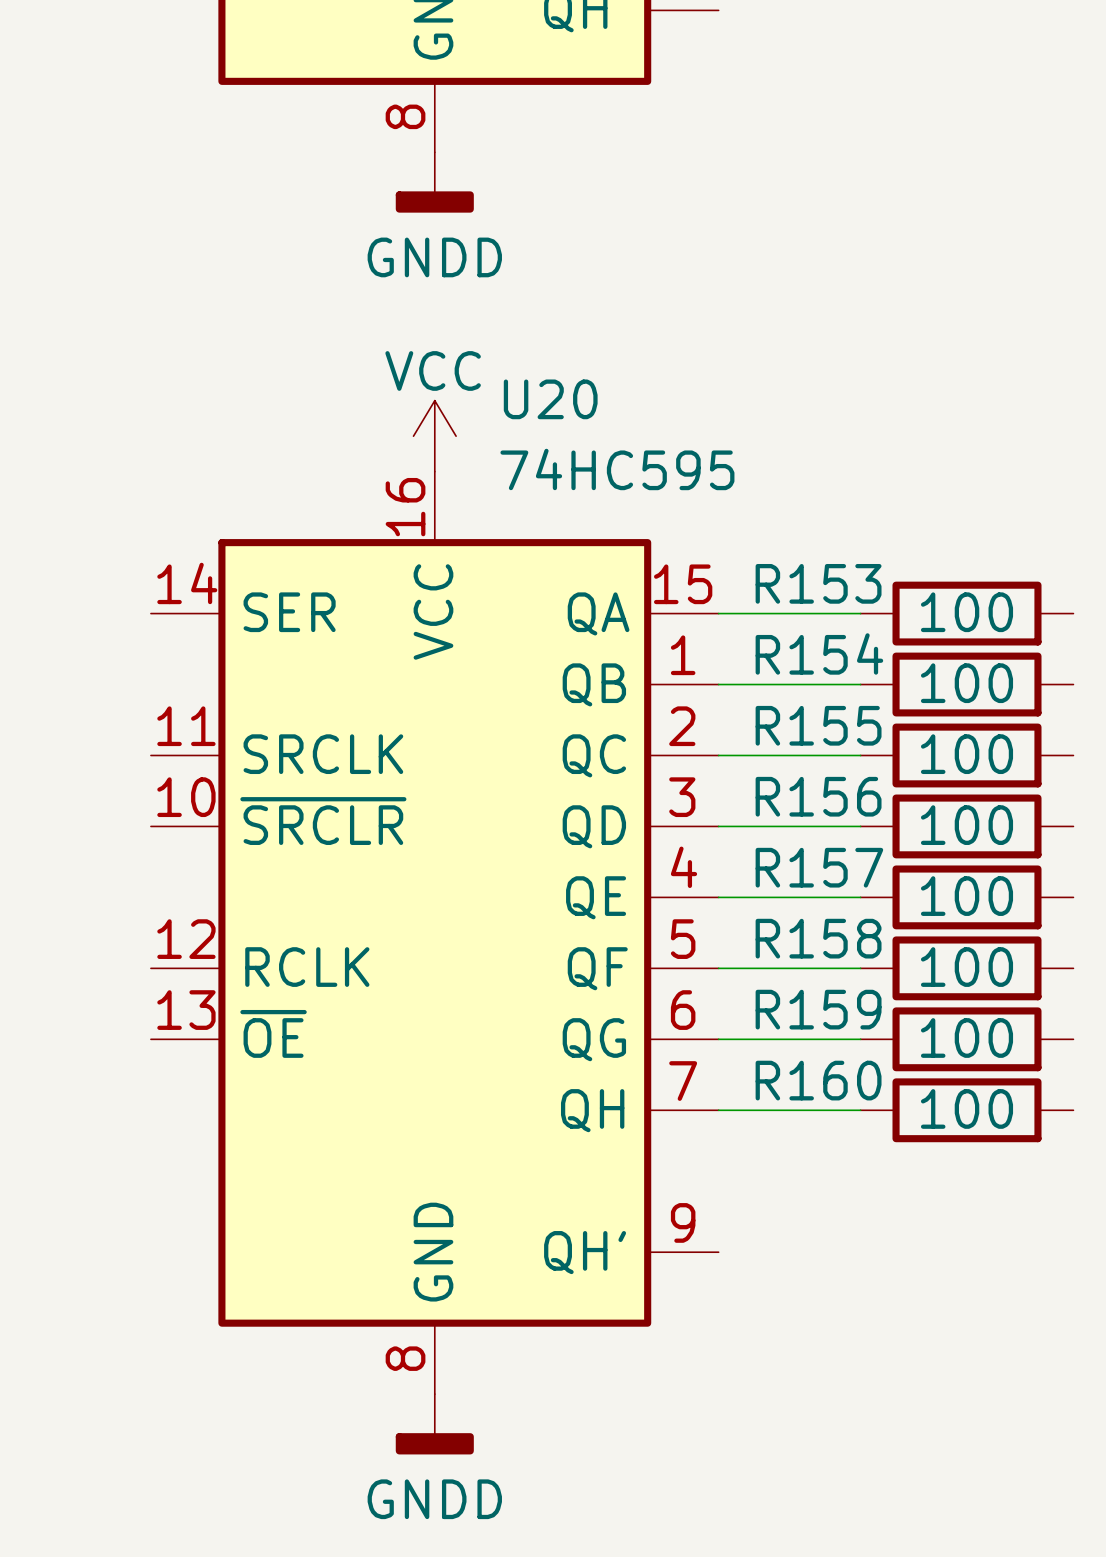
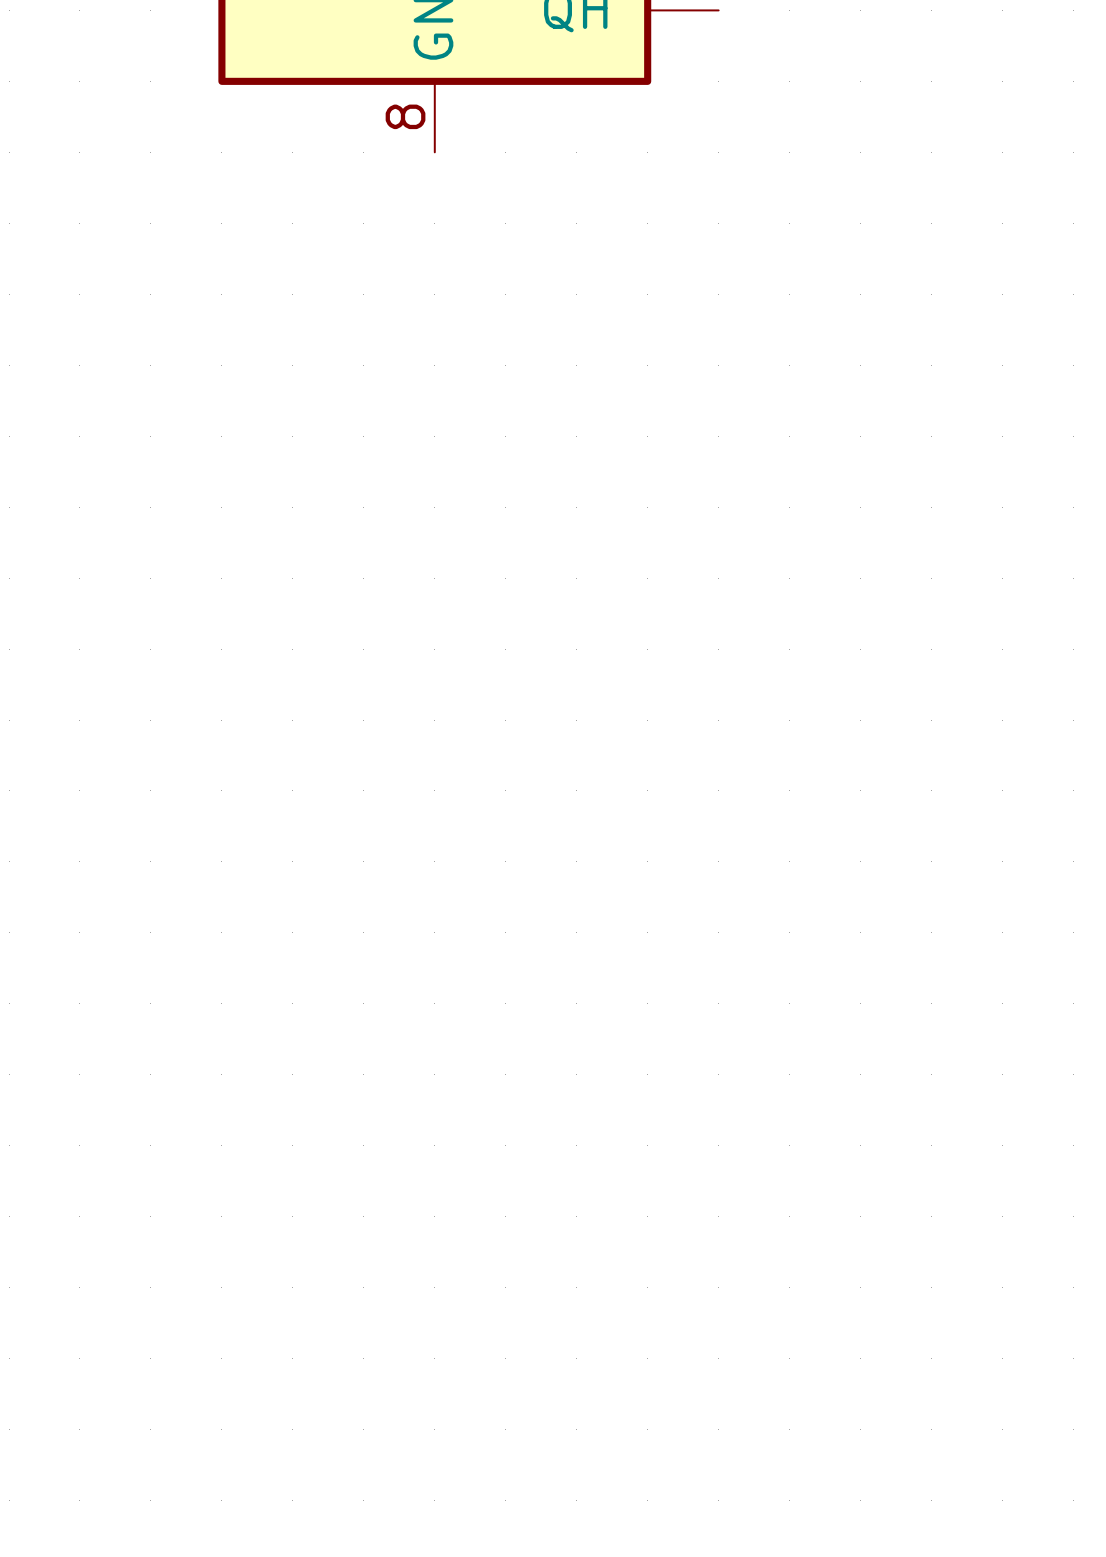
power symbol: GNDD (434, 182) -> none
power symbol: VCC (434, 436) -> none
wire: (718, 613) (860, 613) -> none
R153: 100 (967, 613) -> none
wire: (718, 684) (860, 684) -> none
R154: 100 (967, 684) -> none
wire: (718, 755) (860, 755) -> none
R155: 100 (967, 755) -> none
wire: (718, 826) (860, 826) -> none
R156: 100 (967, 826) -> none
wire: (718, 897) (860, 897) -> none
R157: 100 (967, 897) -> none
U20: 74HC595 (434, 932) -> none
wire: (718, 968) (860, 968) -> none
R158: 100 (967, 968) -> none
wire: (718, 1039) (860, 1039) -> none
R159: 100 (967, 1039) -> none
wire: (718, 1110) (860, 1110) -> none
R160: 100 (967, 1110) -> none
power symbol: GNDD (434, 1424) -> none

